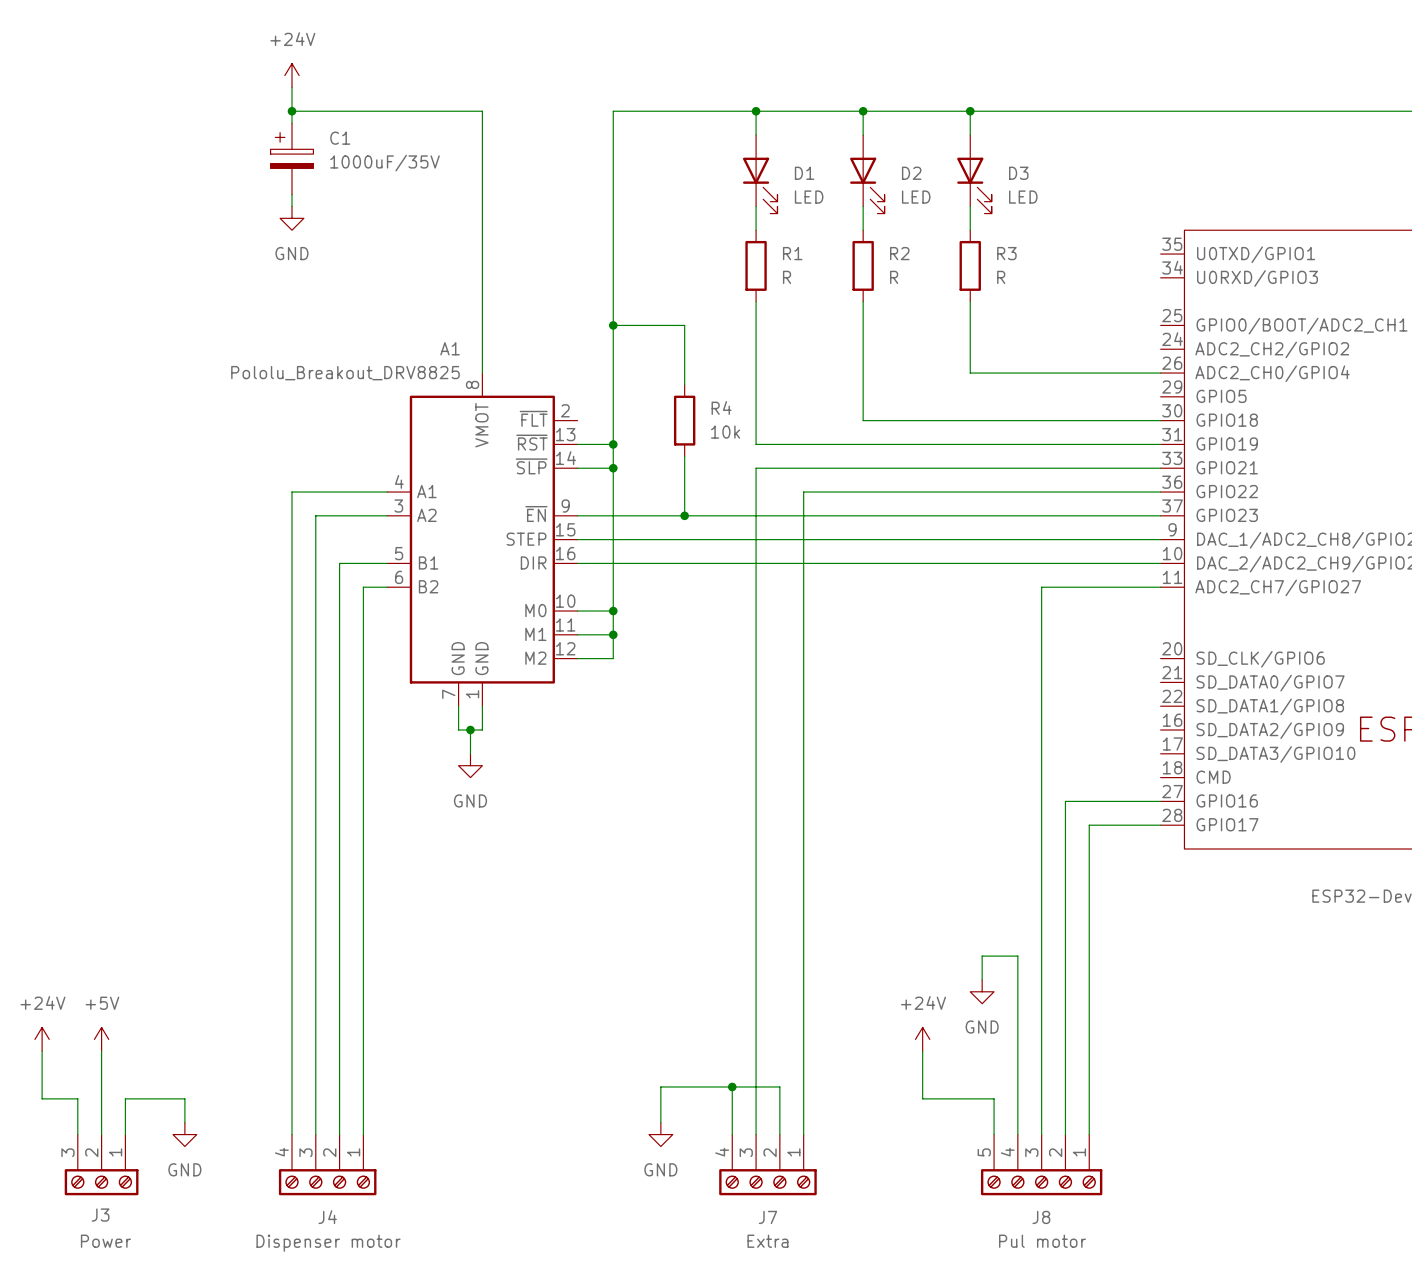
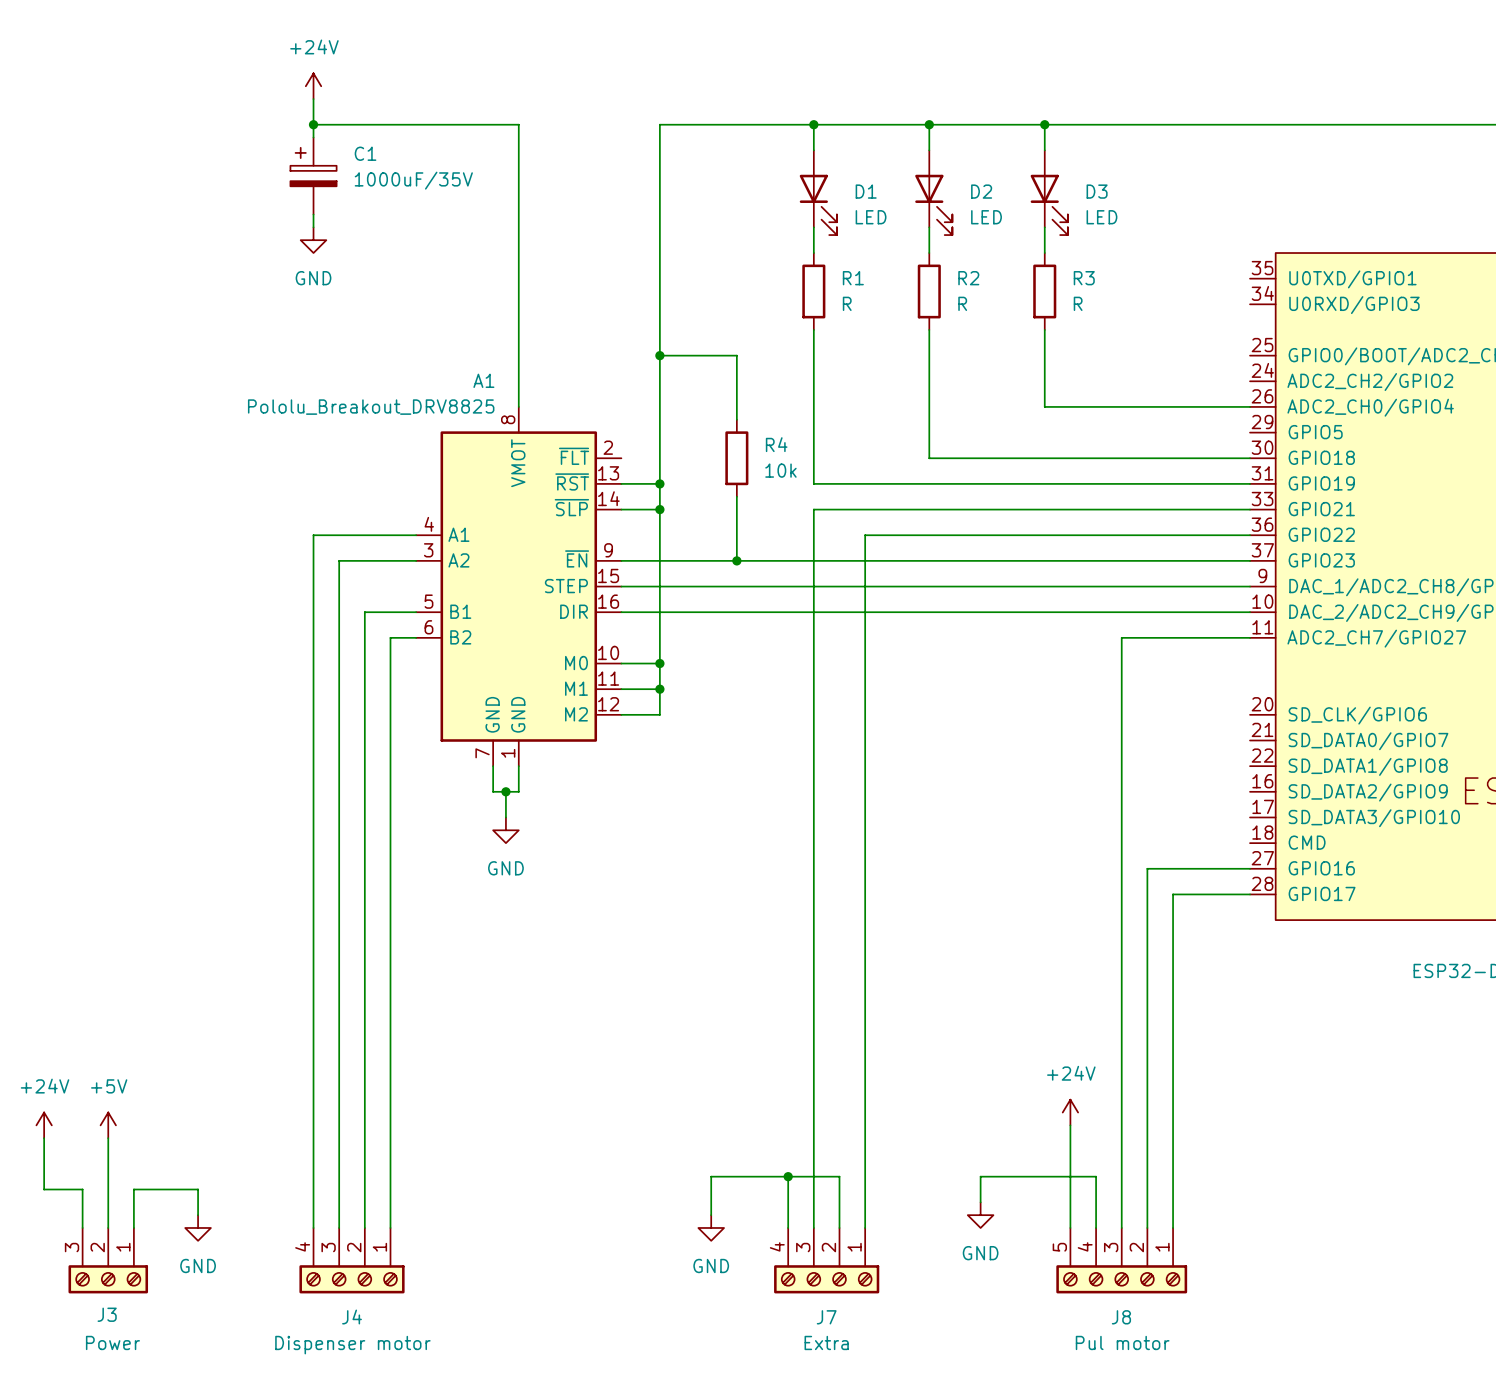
wire: (982, 979) (982, 956) (1017, 956) (1017, 1086) -> (980, 1202) (980, 1176) (1096, 1176)
power symbol position: GND (982, 991) -> GND (980, 1215)
power symbol position: +24V (922, 1039) -> +24V (1070, 1112)
wire: (922, 1051) (922, 1098) (994, 1098) -> (1070, 1125) (1070, 1189)

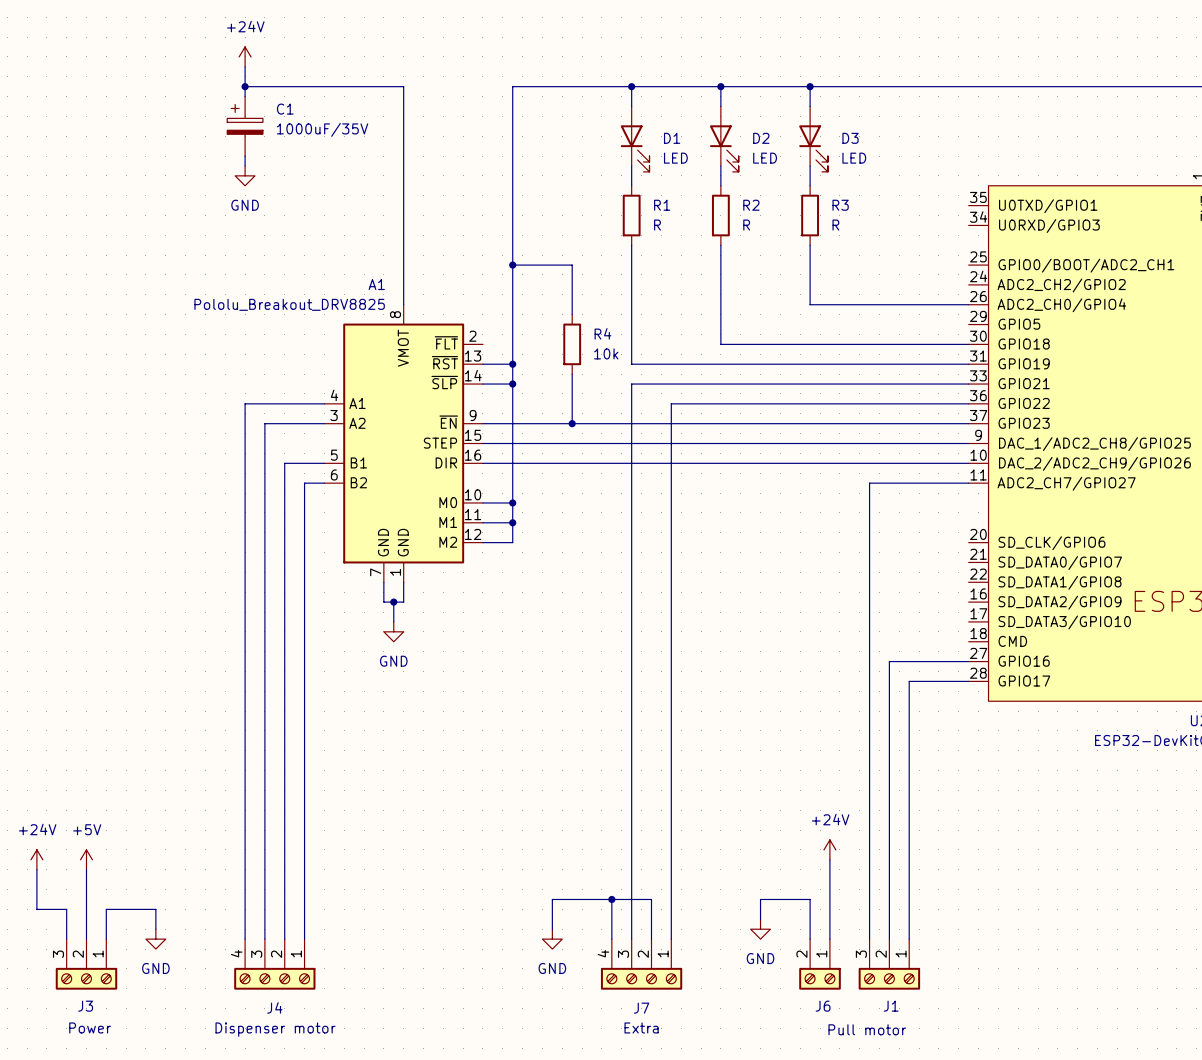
wire: (1044, 1176) (1096, 1176) (1096, 1227) -> (810, 899) (810, 939)
J6: none -> (820, 964)
J8: Pul motor (1121, 1260) -> none
J1: none -> Pull motor (889, 964)

